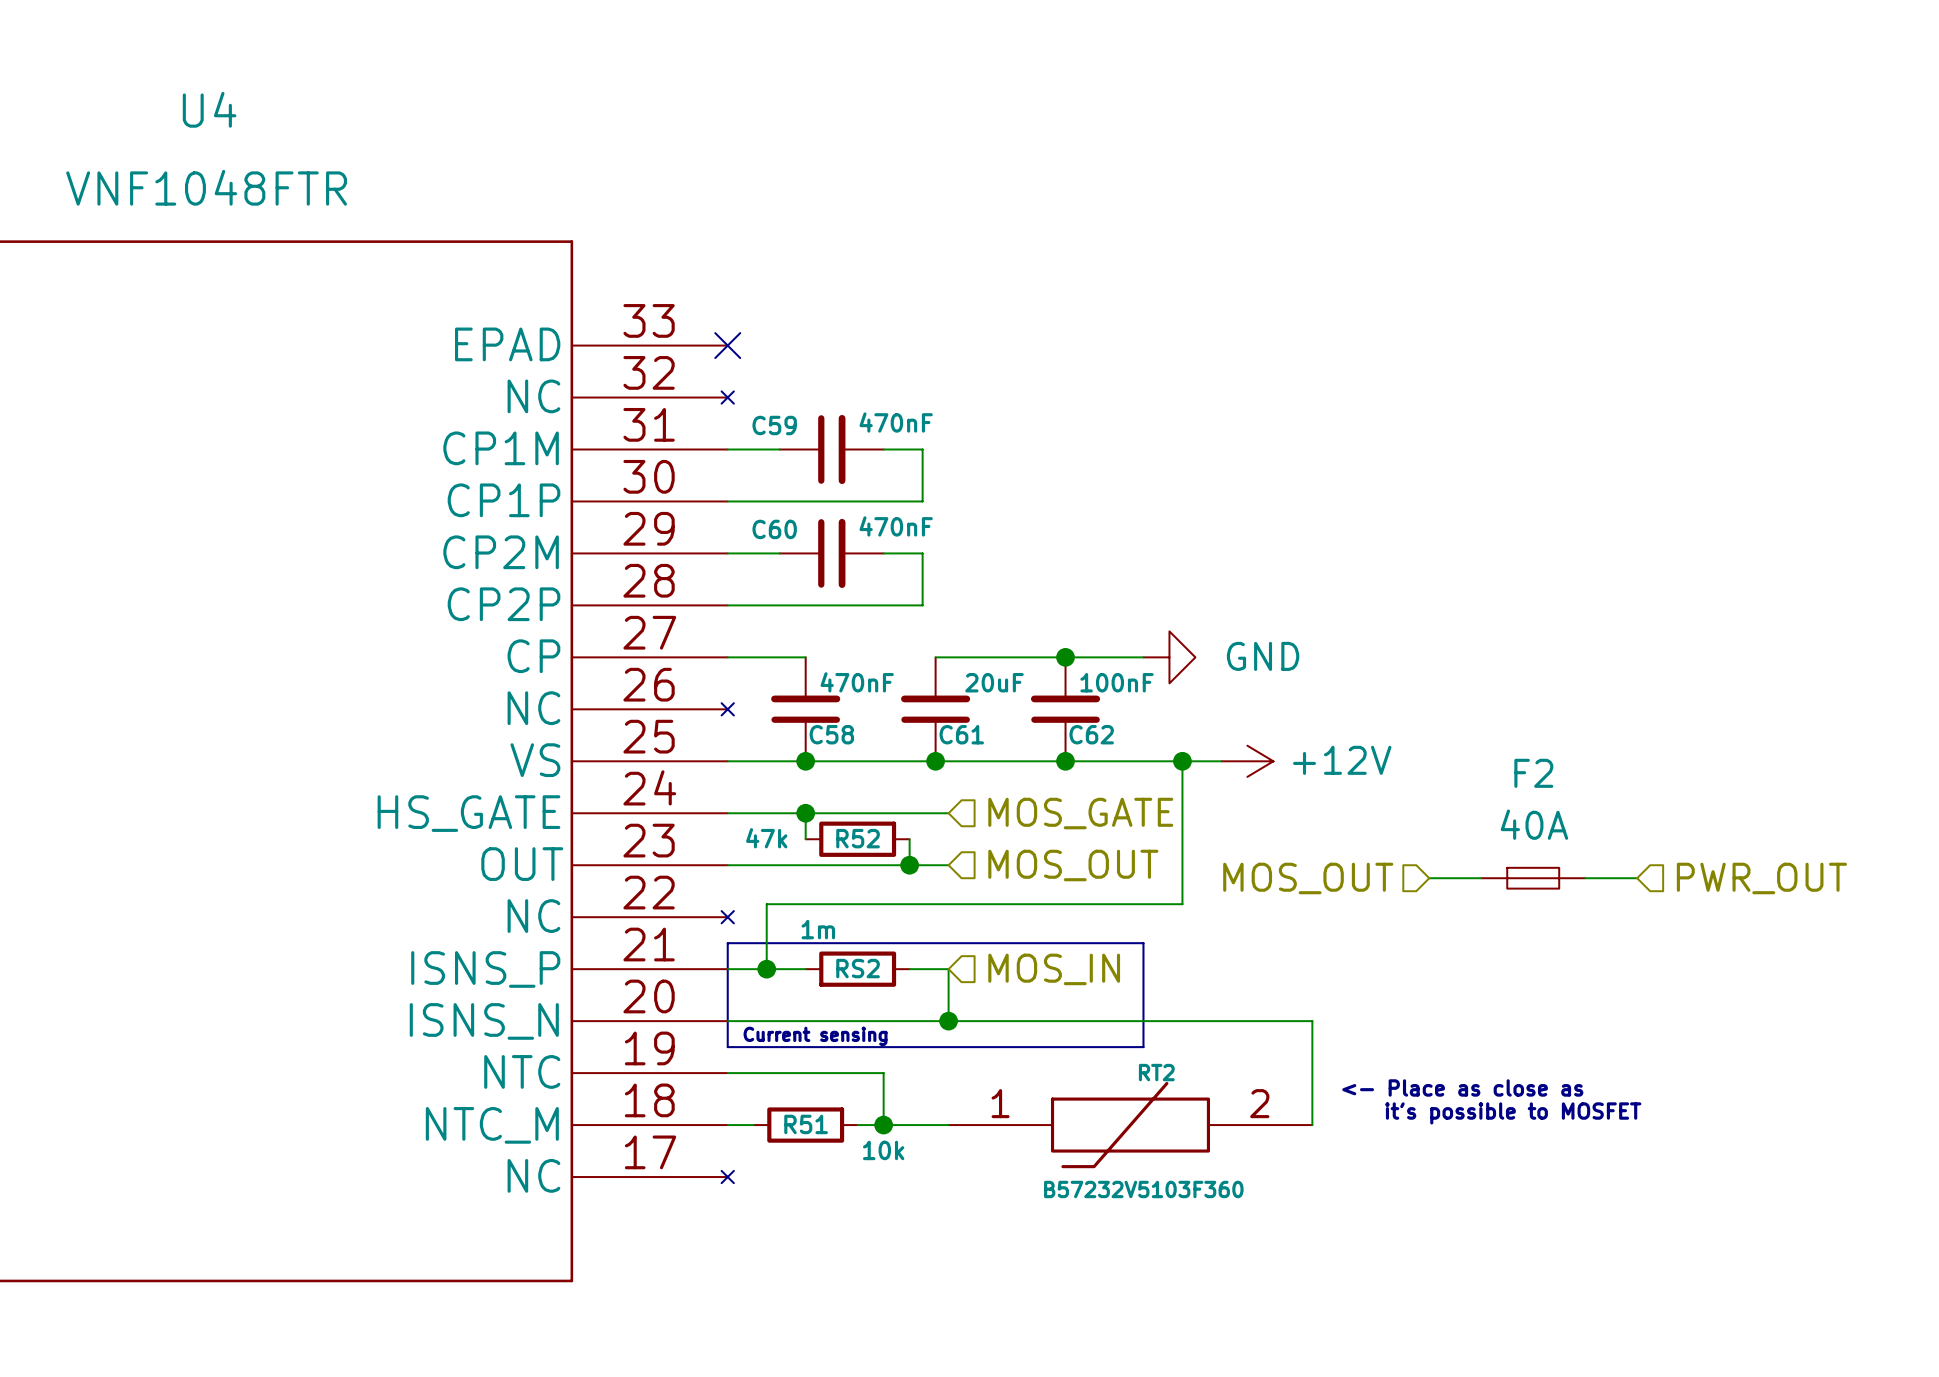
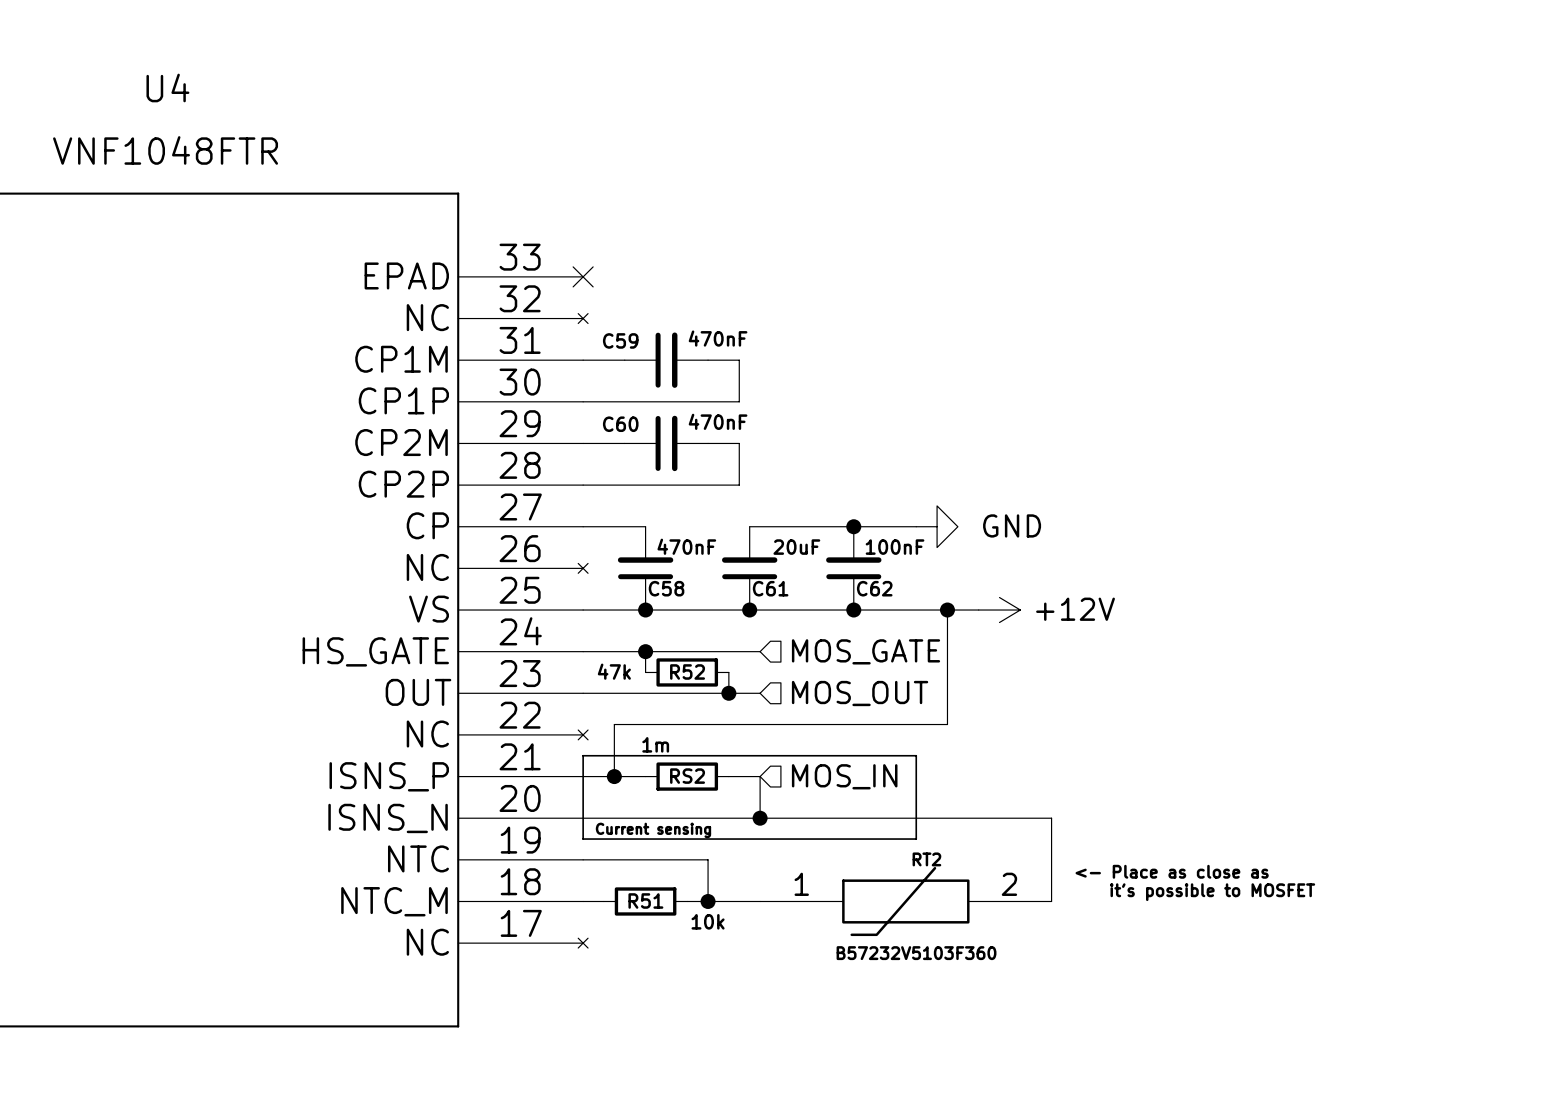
hierarchical label: MOS_OUT (1308, 878) -> none
wire: (1429, 878) (1481, 878) -> none
F2: 40A (1533, 878) -> none
wire: (1585, 878) (1637, 878) -> none
hierarchical label: PWR_OUT (1761, 878) -> none

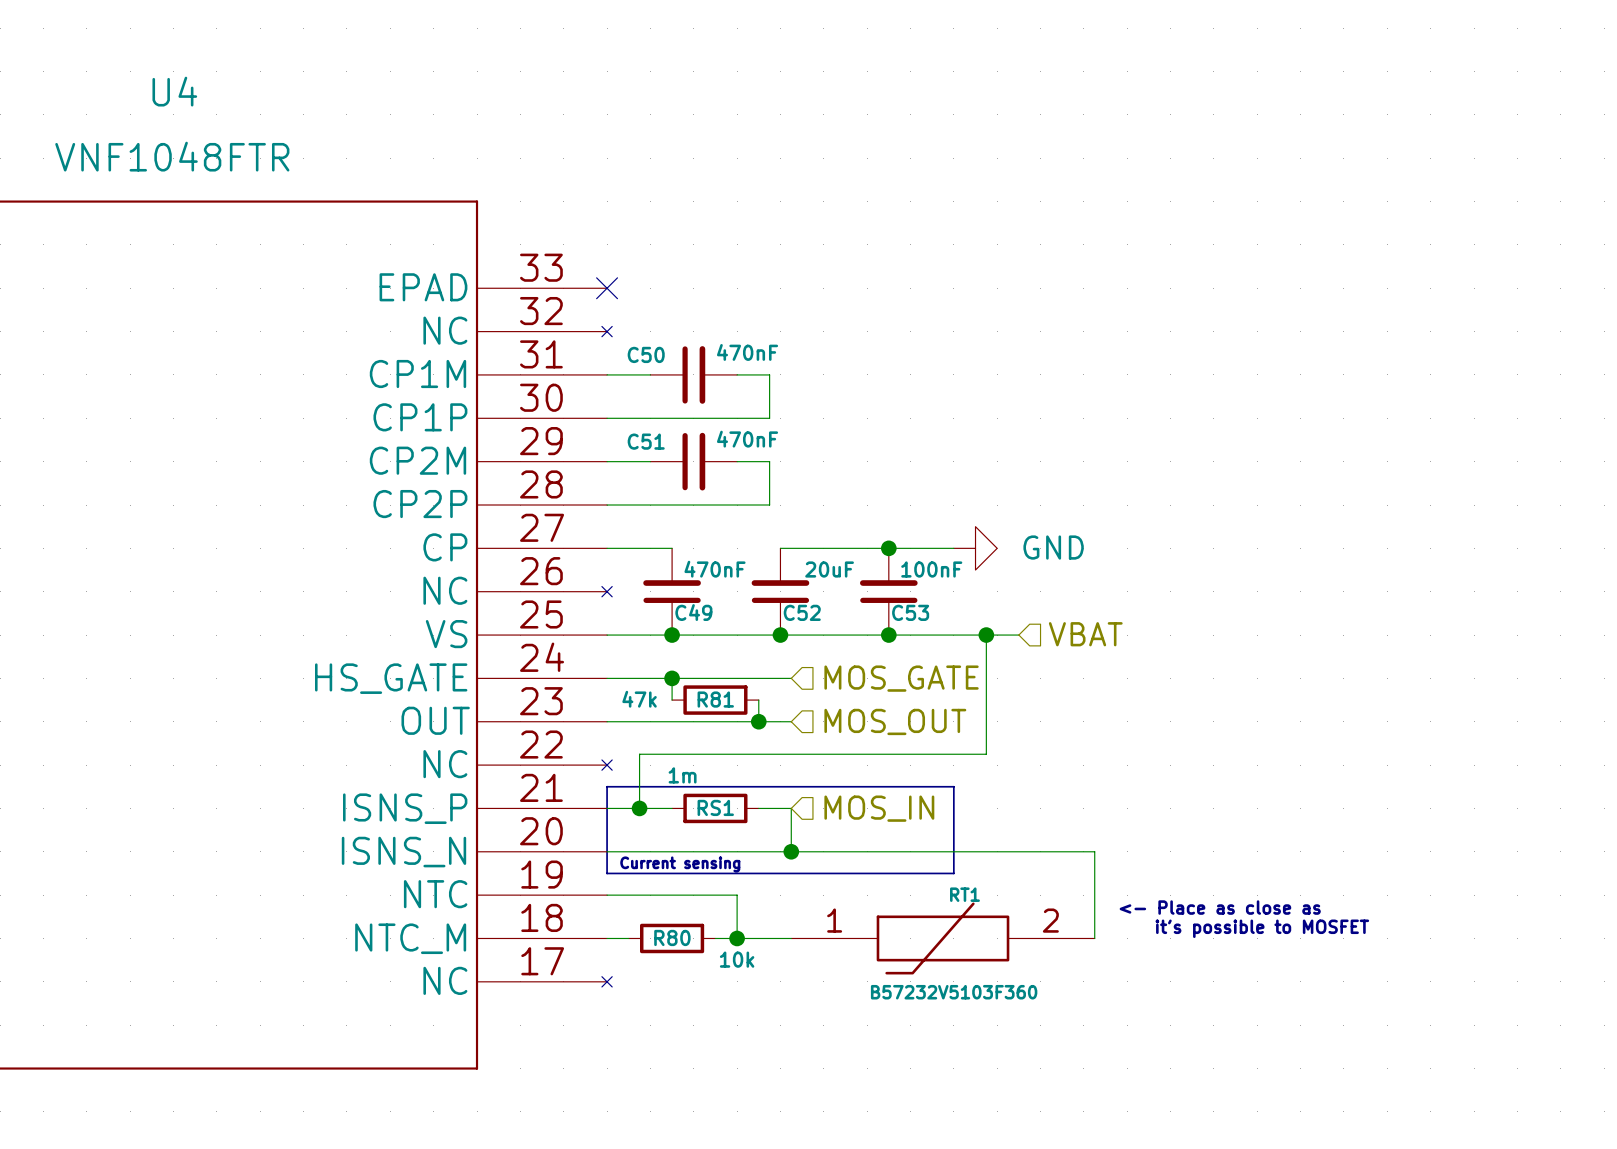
C59 name: C59 (620, 340) -> C50 (646, 354)
C60 name: C60 (620, 424) -> C51 (646, 441)
C58 name: C58 (666, 588) -> C49 (693, 612)
C61 name: C61 (770, 588) -> C52 (802, 612)
C62 name: C62 (874, 588) -> C53 (910, 612)
hierarchical label: none -> VBAT (1085, 634)
power symbol: +12V (999, 610) -> none
R52 name: R52 (687, 671) -> R81 (715, 699)
RS2 name: RS2 (687, 776) -> RS1 (715, 807)
RT2 name: RT2 (926, 859) -> RT1 (964, 894)
R51 name: R51 (645, 901) -> R80 (672, 937)

